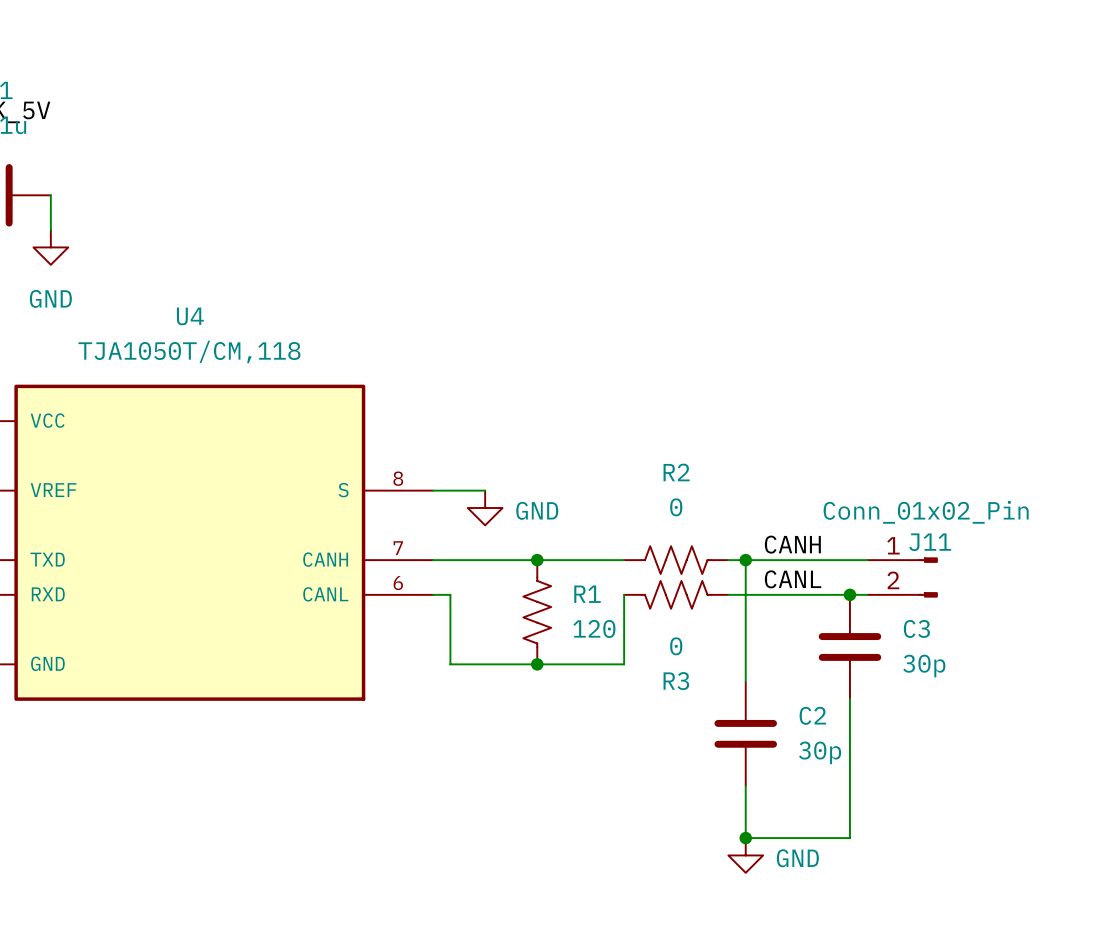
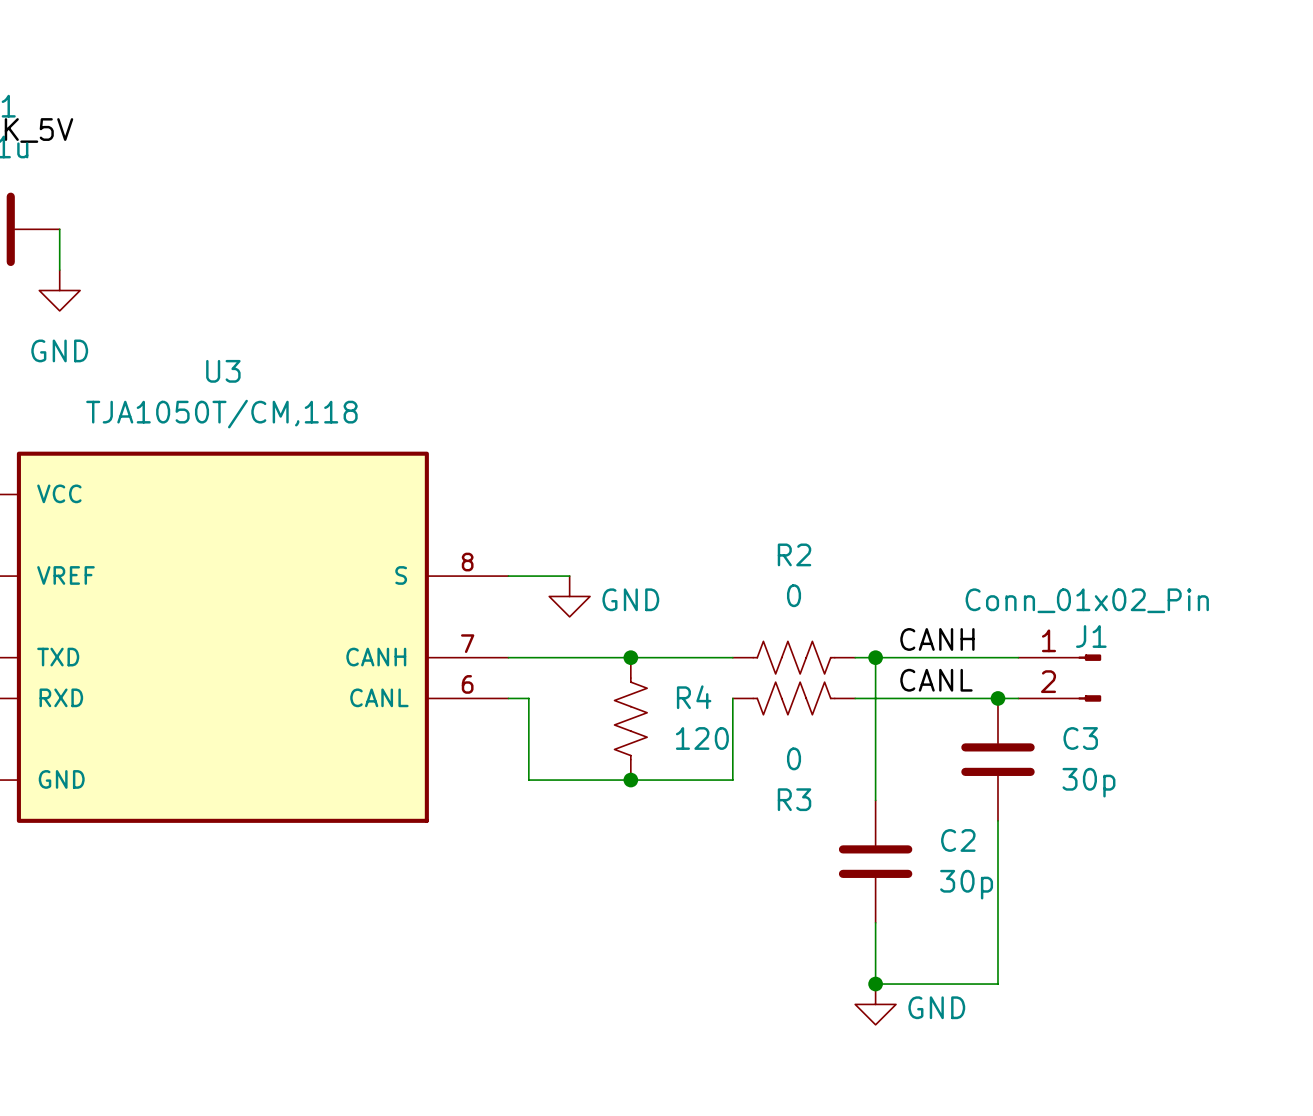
U4 name: U4 (190, 316) -> U3 (223, 371)
J11 name: J11 (930, 542) -> J1 (1091, 636)
R1 name: R1 (587, 594) -> R4 (694, 697)

